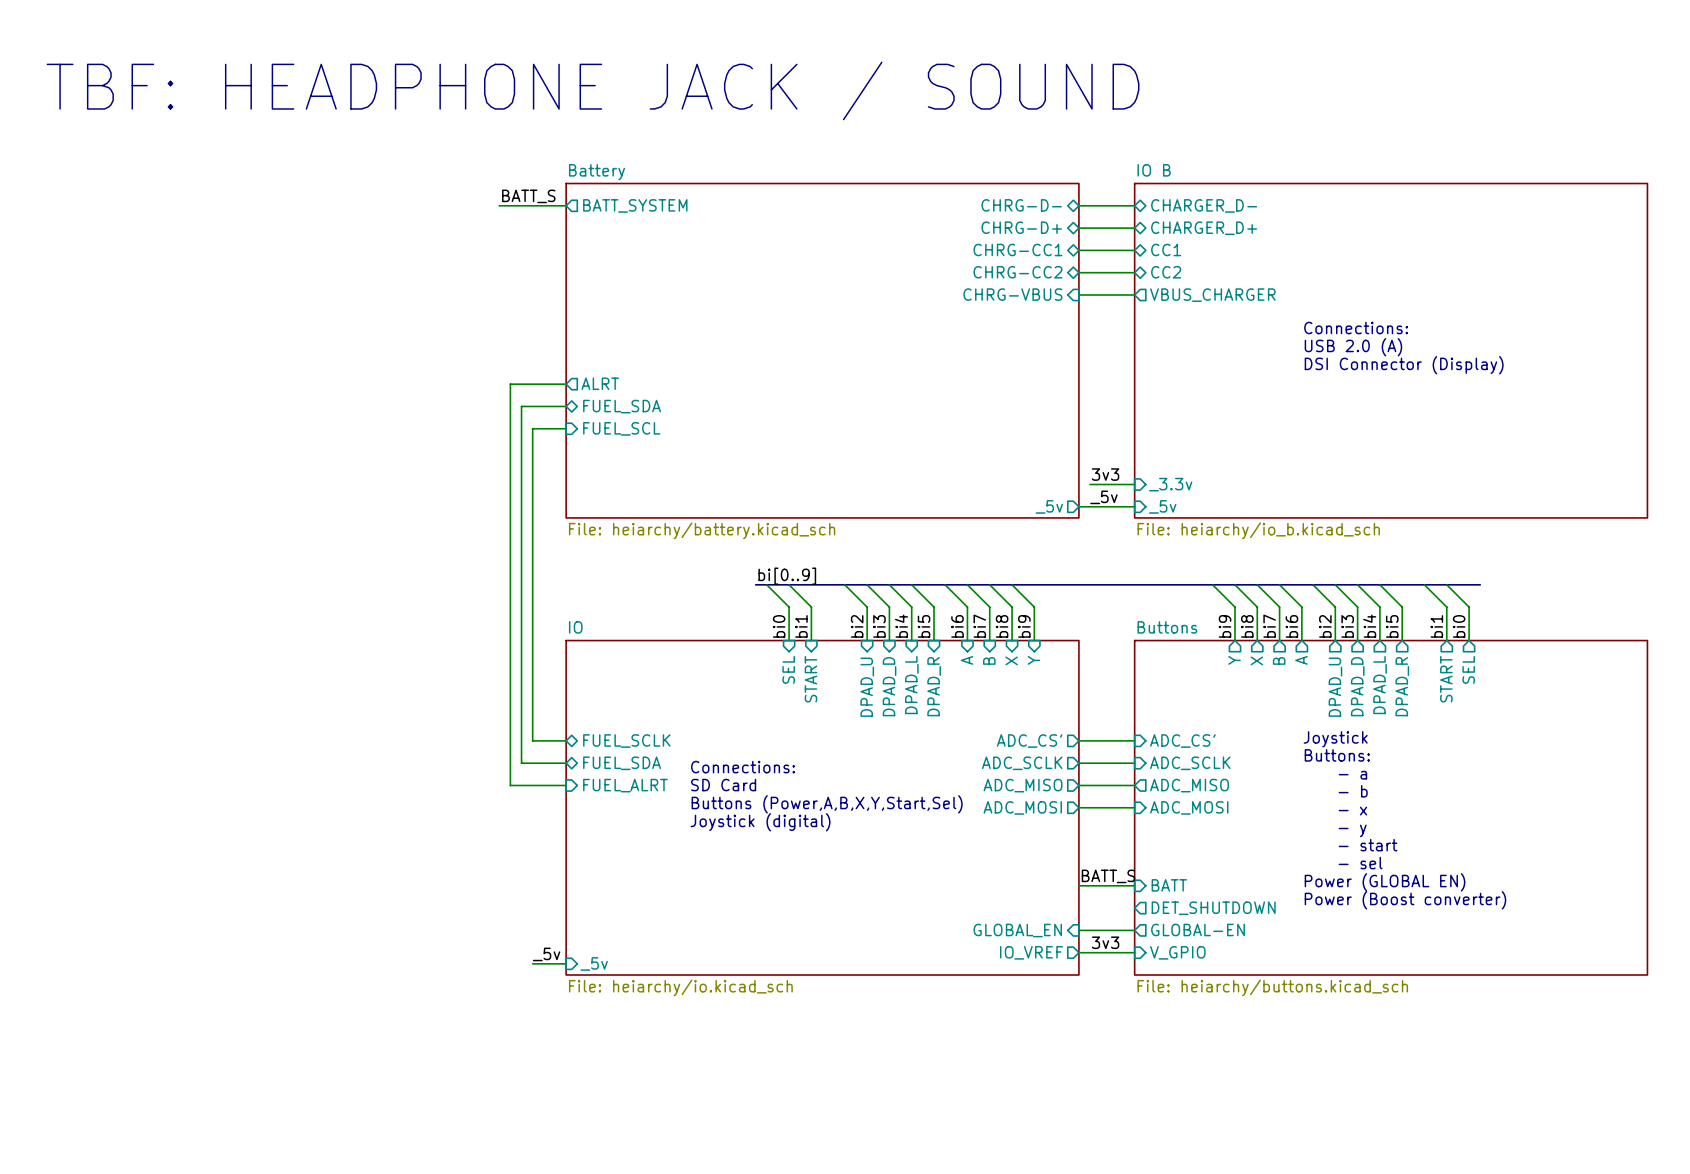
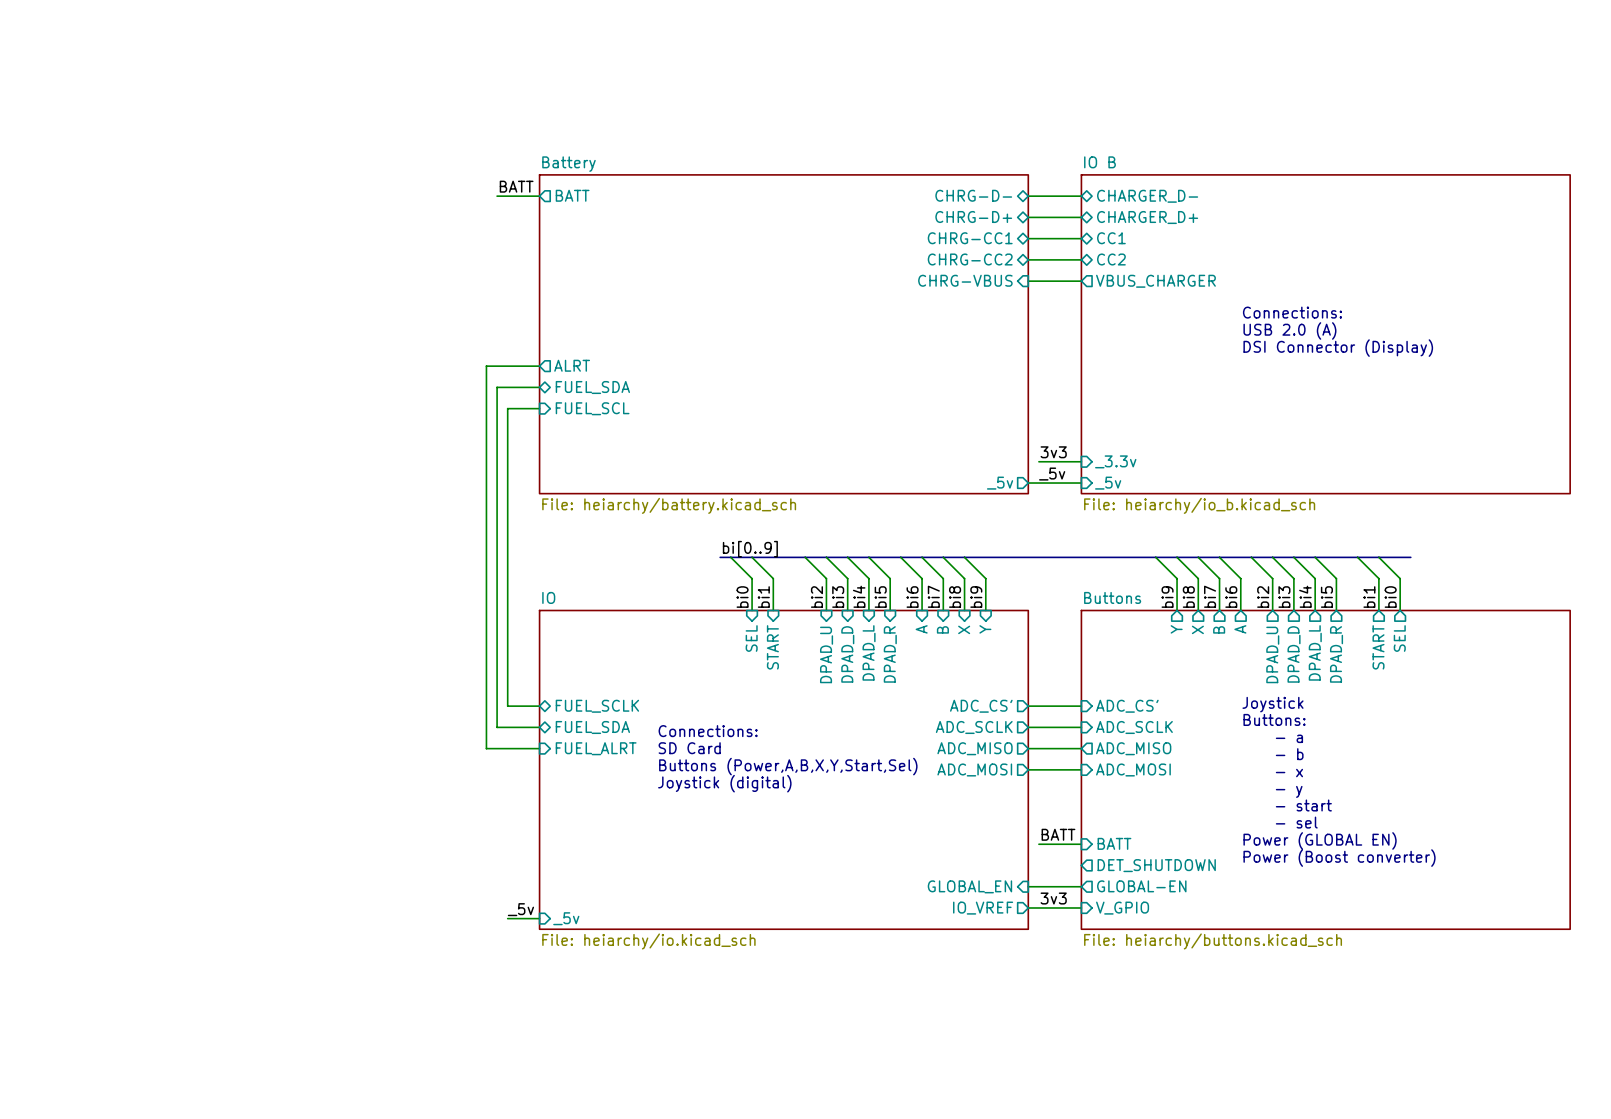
text: TBF: HEADPHONE JACK / SOUND (593, 90) -> none
label: BATT_S (528, 196) -> BATT (516, 186)
wire: (499, 205) (521, 205) -> none
sheet pin: BATT_SYSTEM (635, 205) -> BATT (572, 195)
label: BATT_S (1108, 876) -> BATT (1058, 834)
wire: (1078, 885) (1090, 885) -> none

